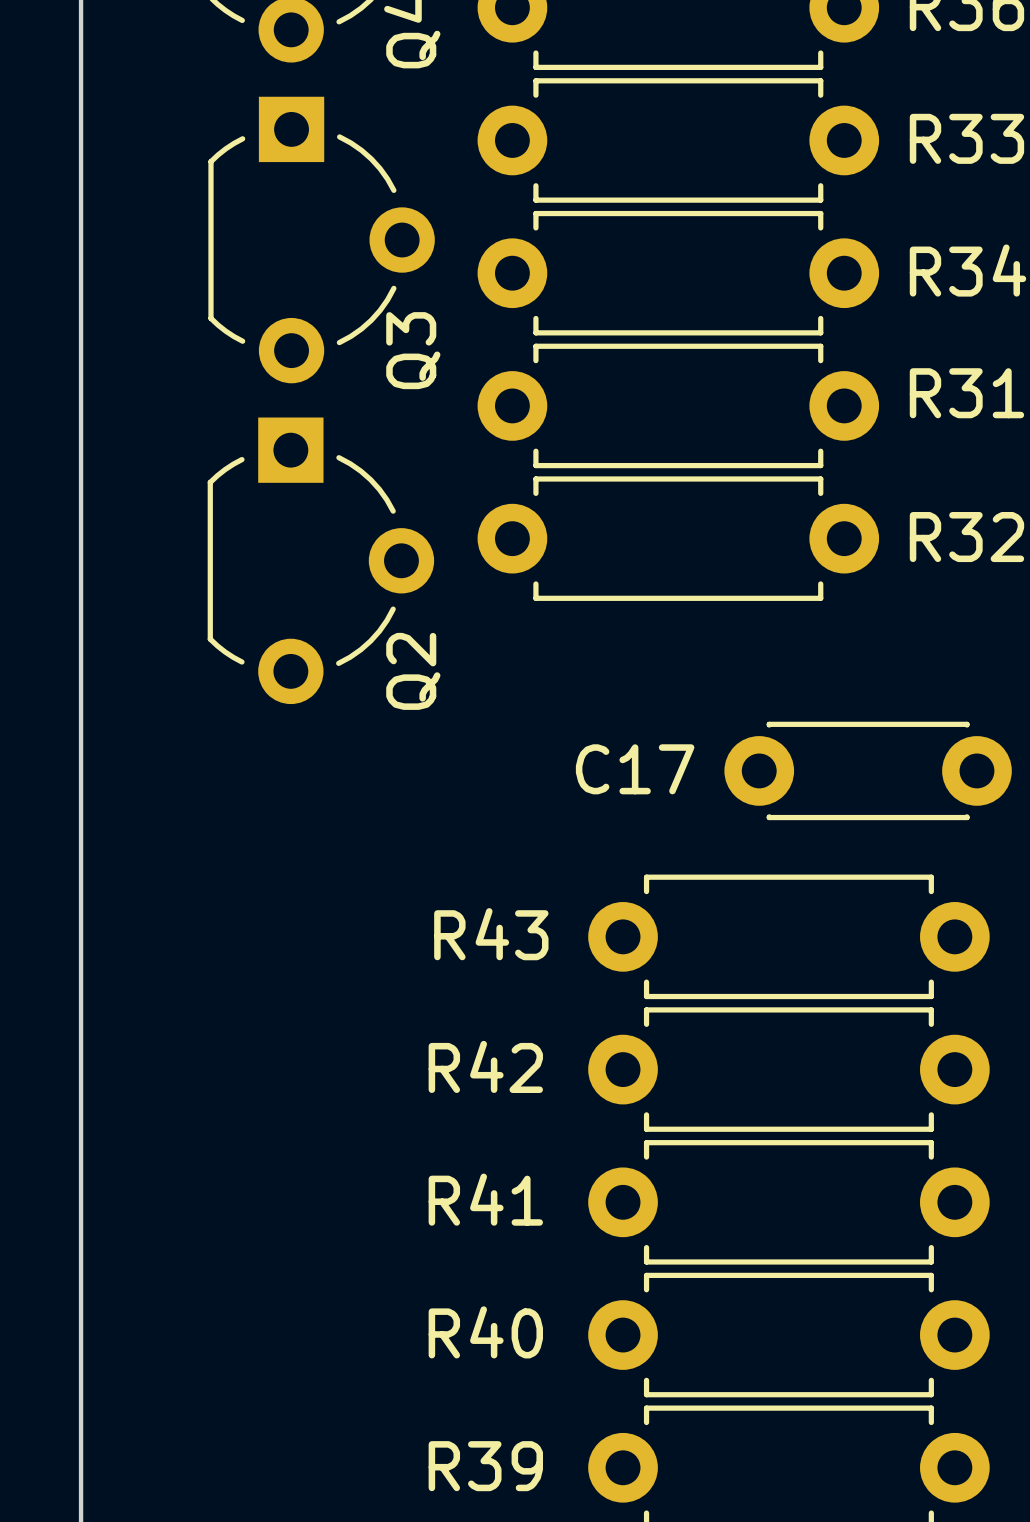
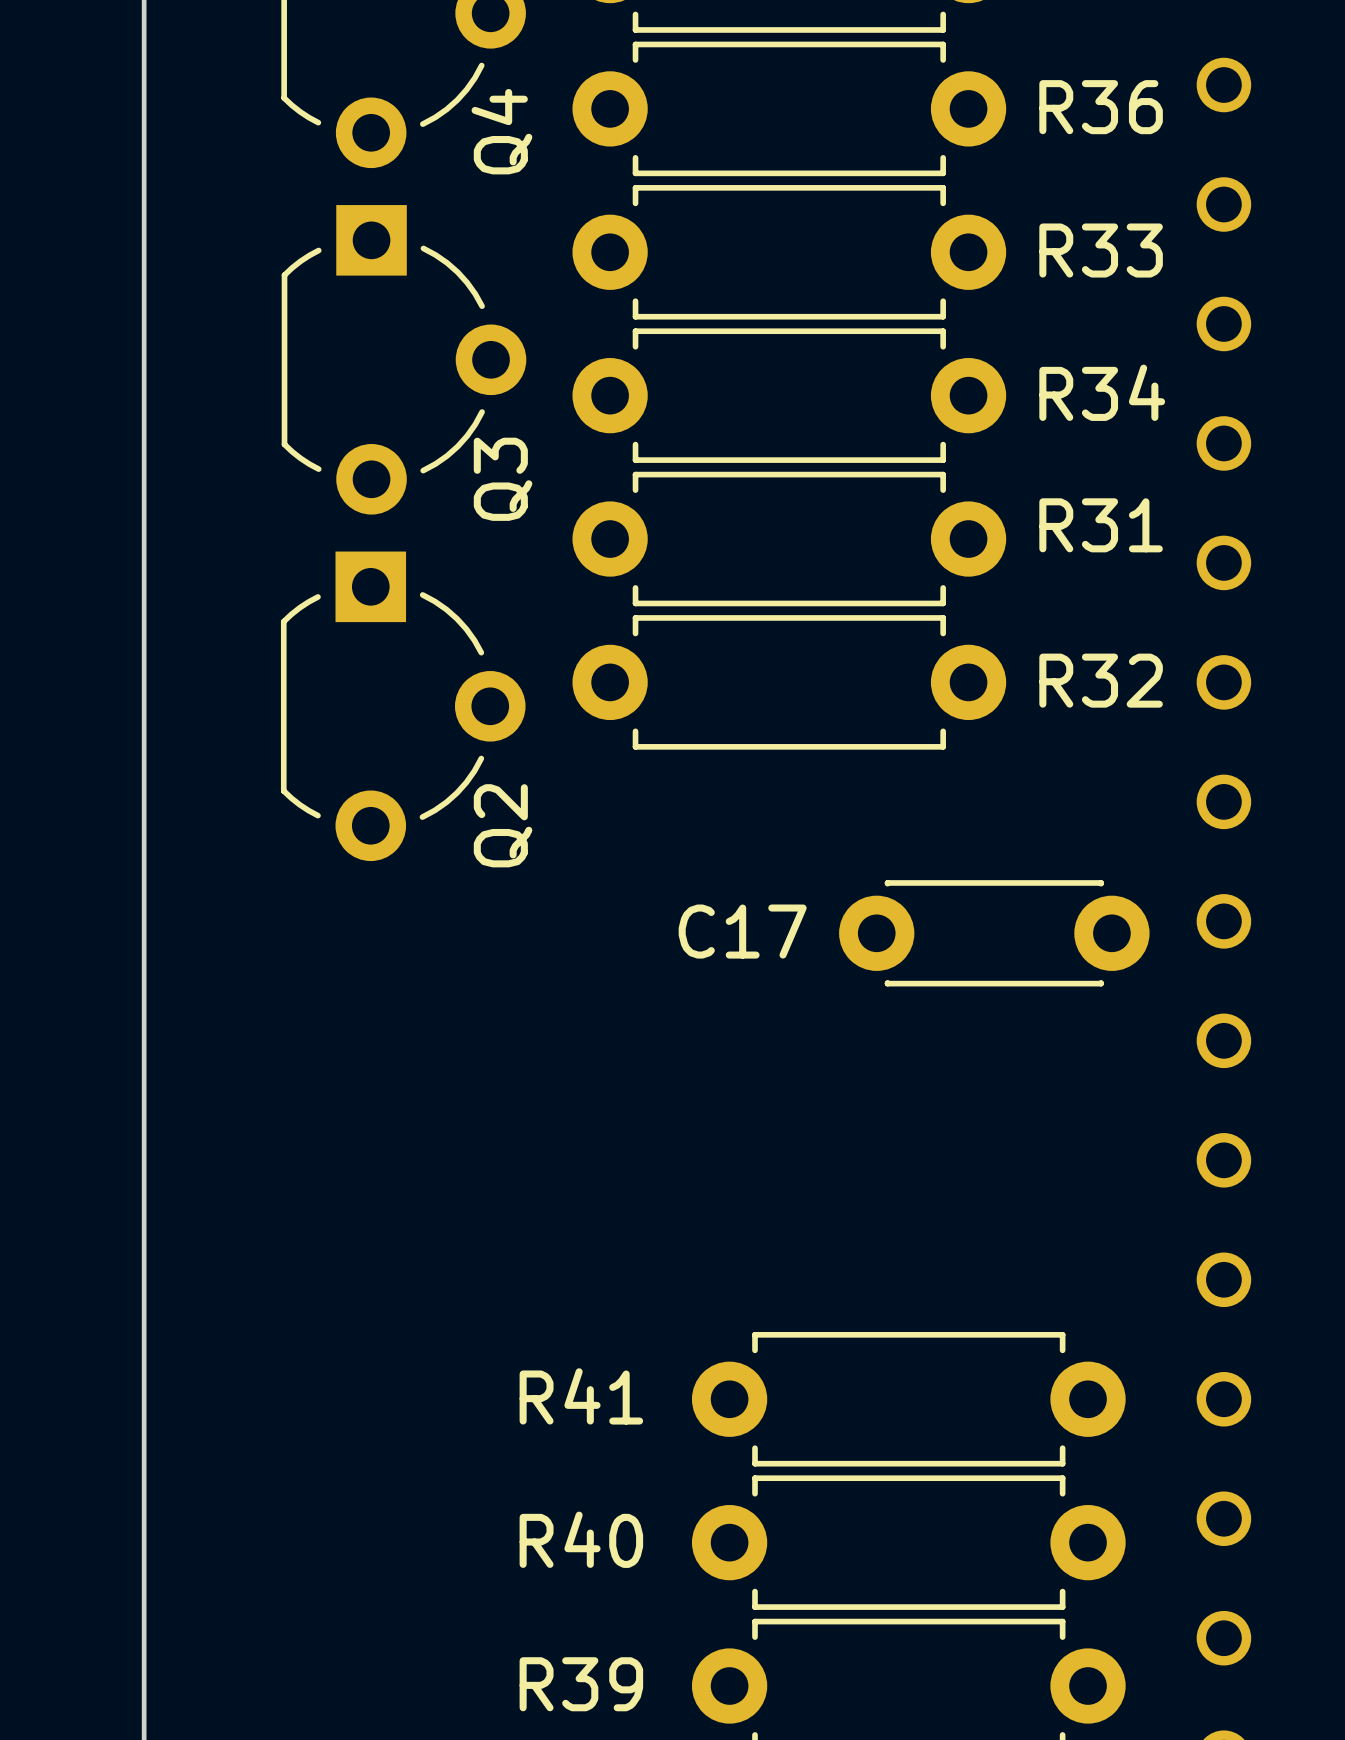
R43: (788, 936) -> none
R42: (788, 1069) -> none

